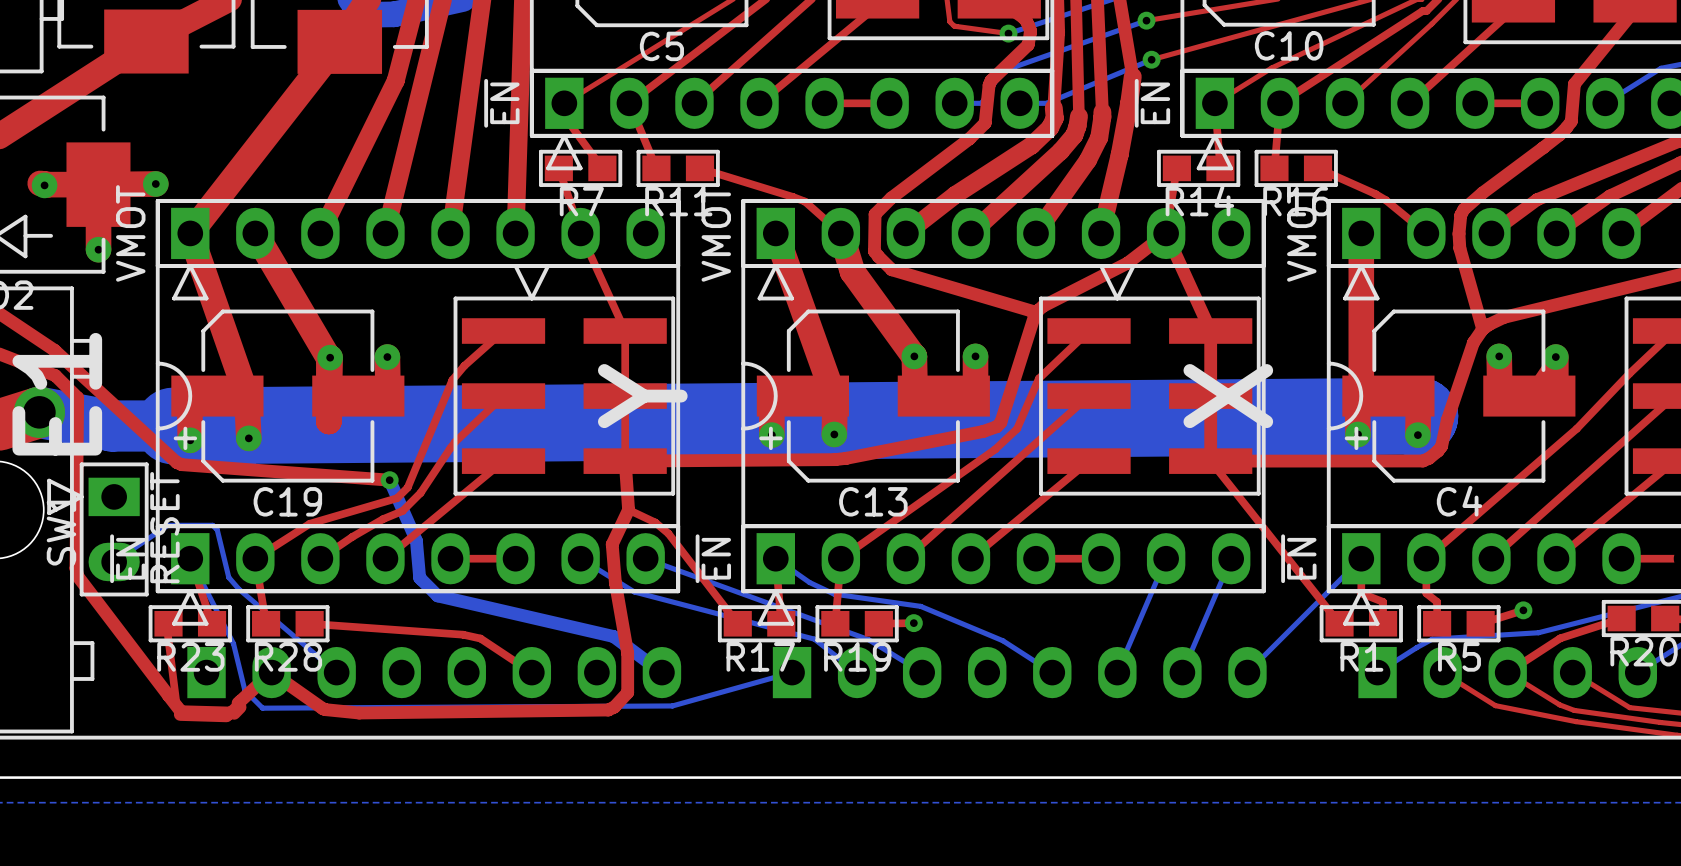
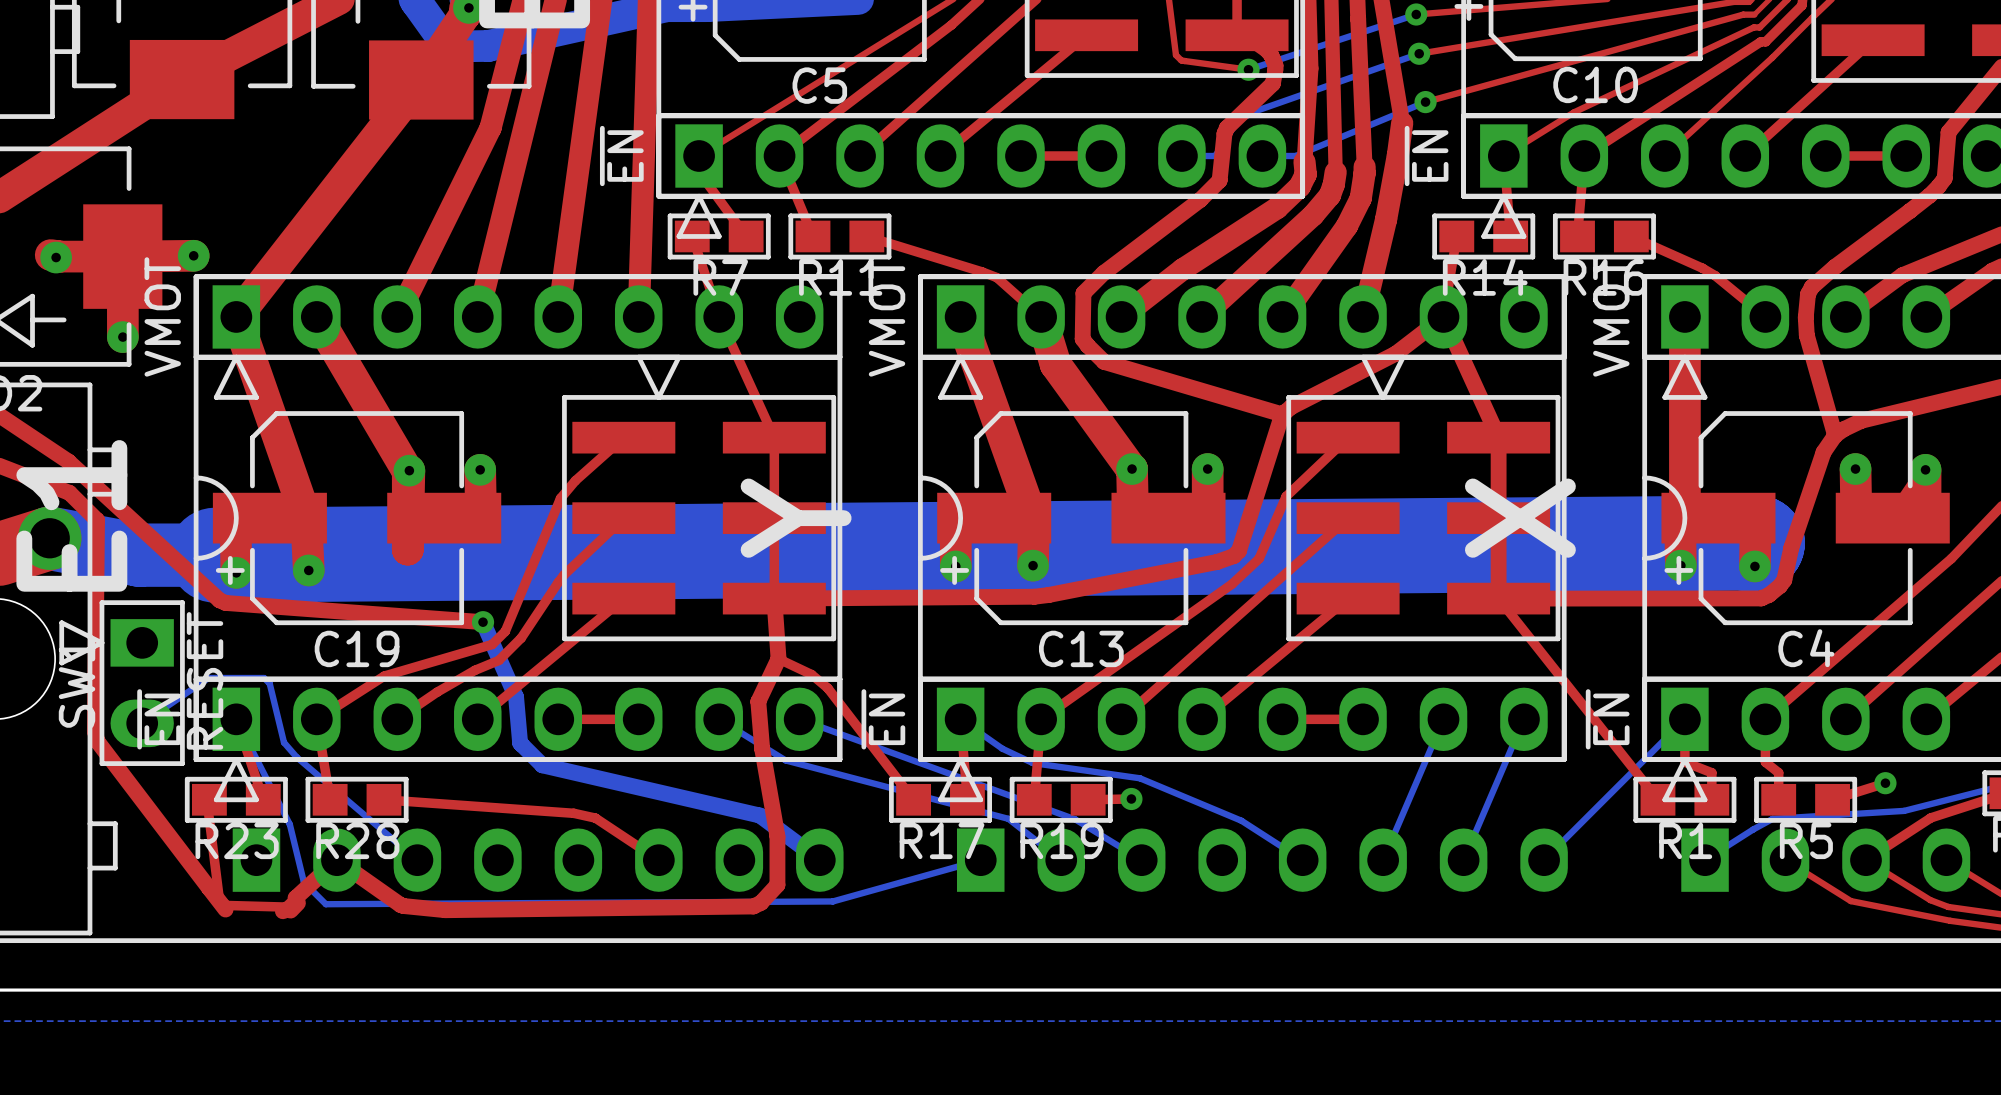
top track: (180, 714) (226, 715) -> none

